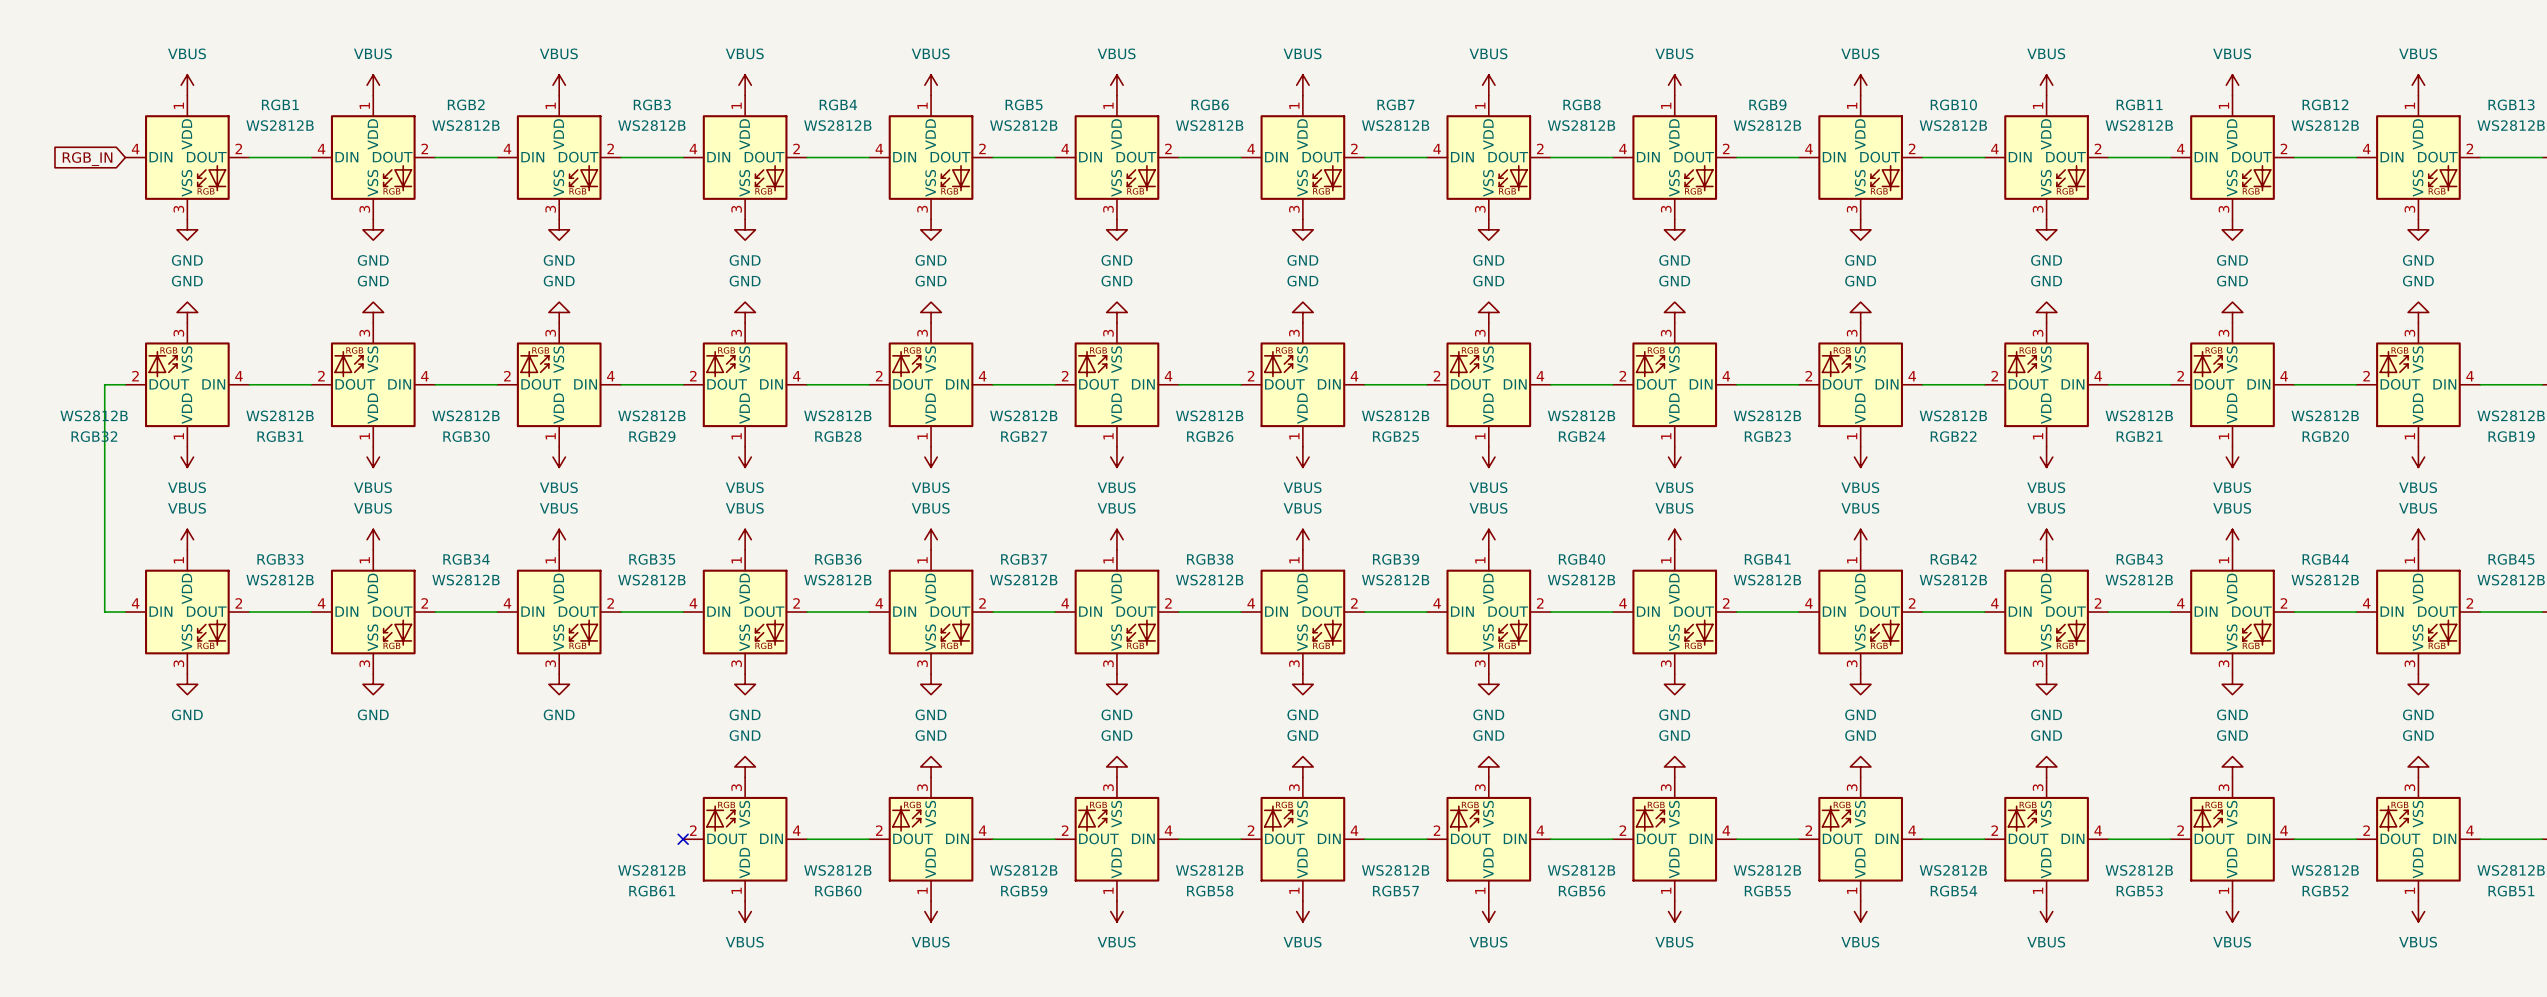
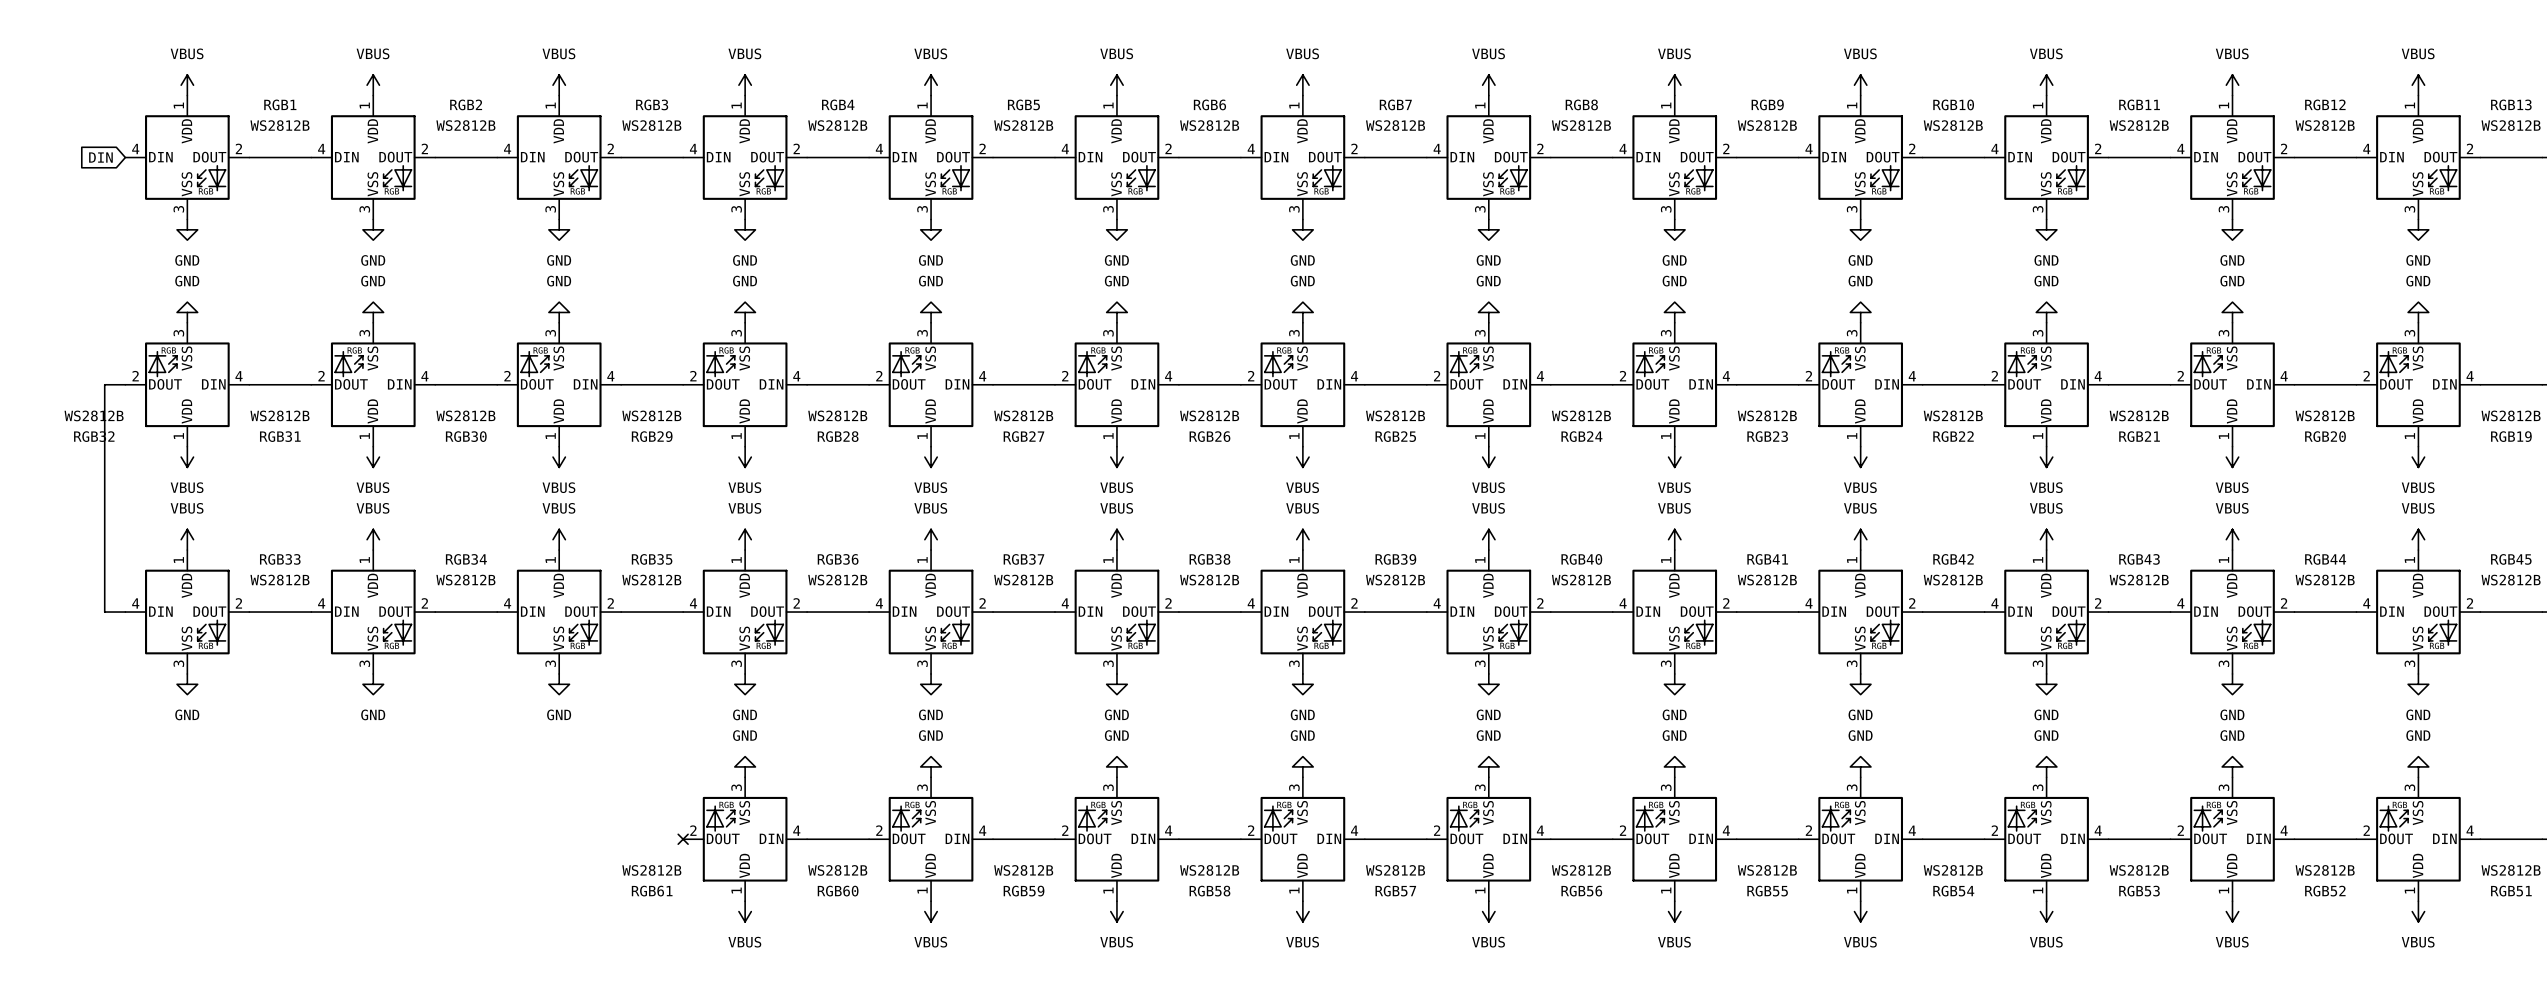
global label: RGB_IN (87, 159) -> DIN (100, 157)

